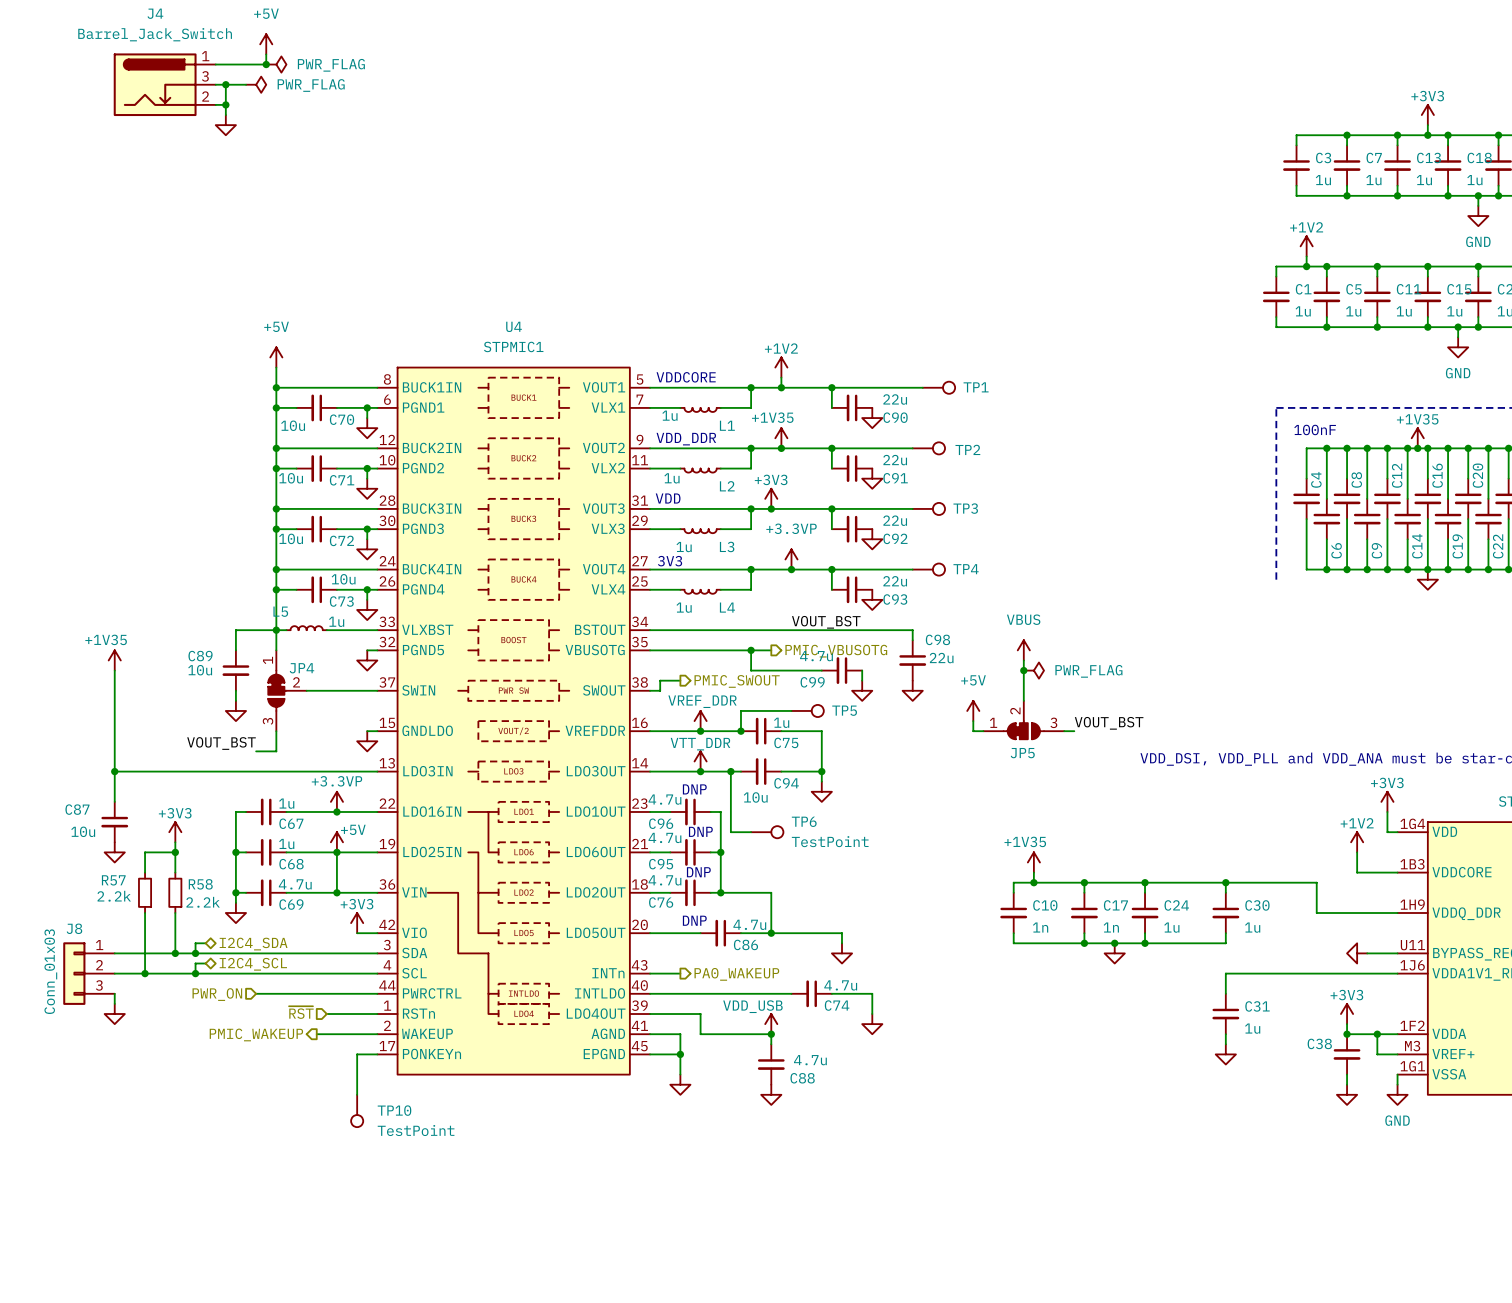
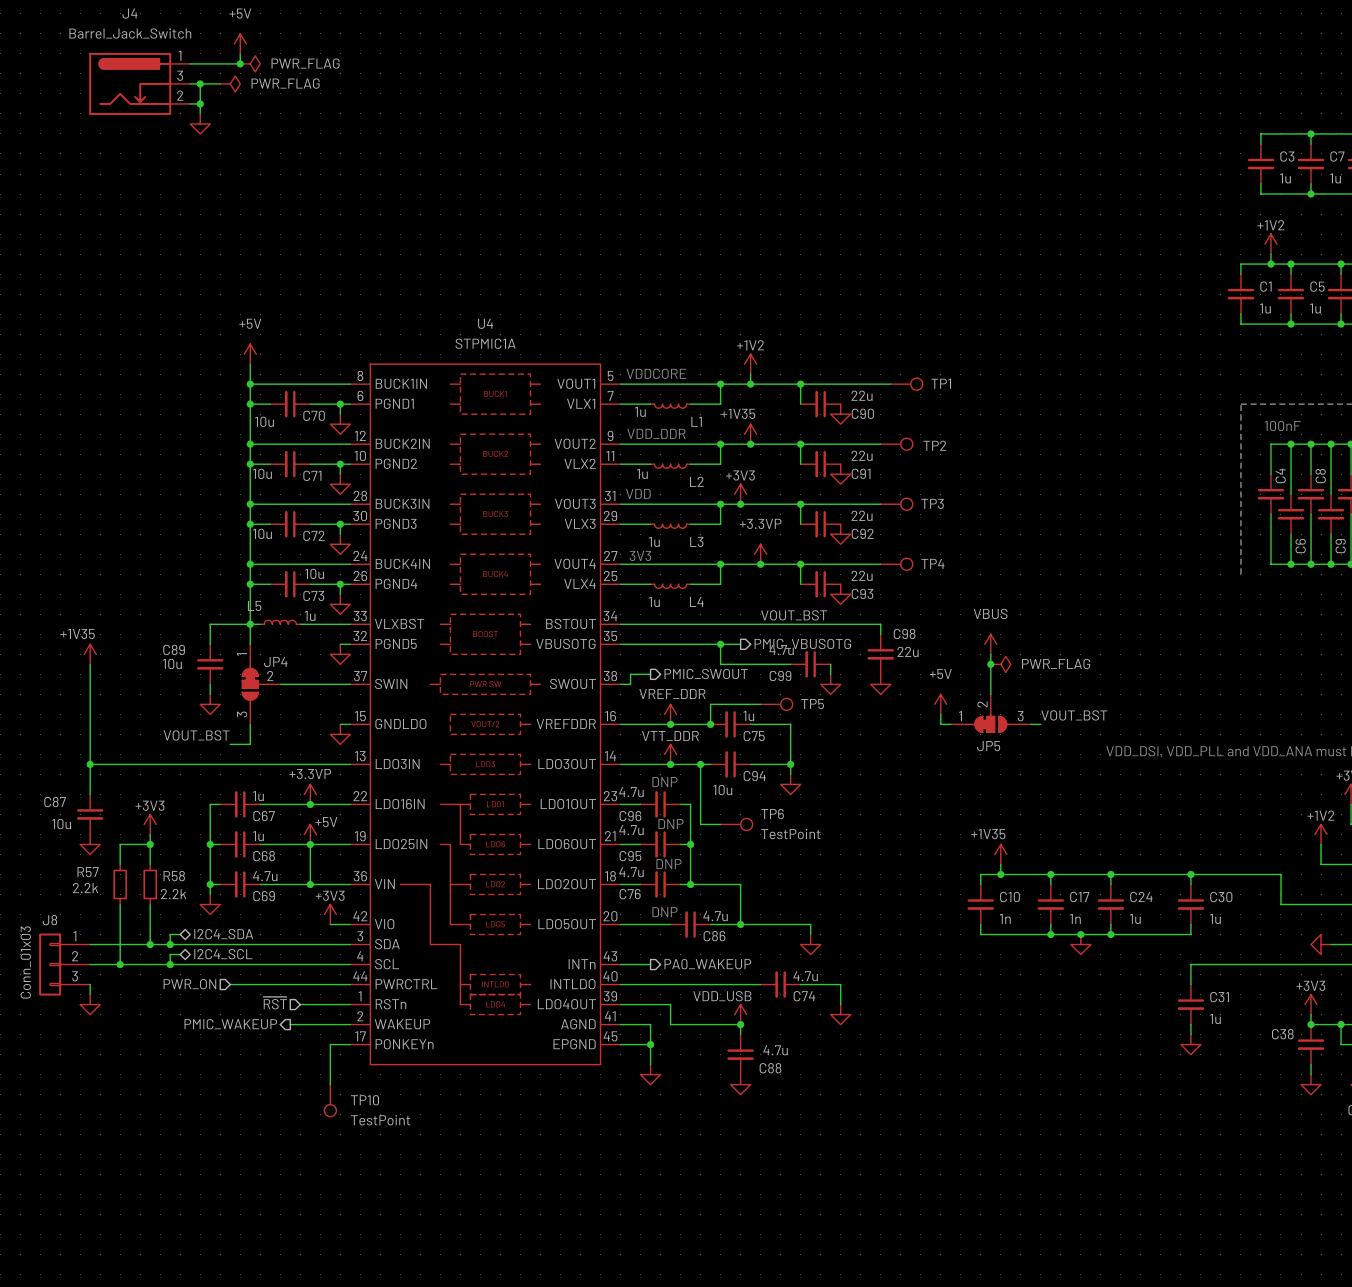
U4 value: STPMIC1 (513, 346) -> STPMIC1A (485, 343)

